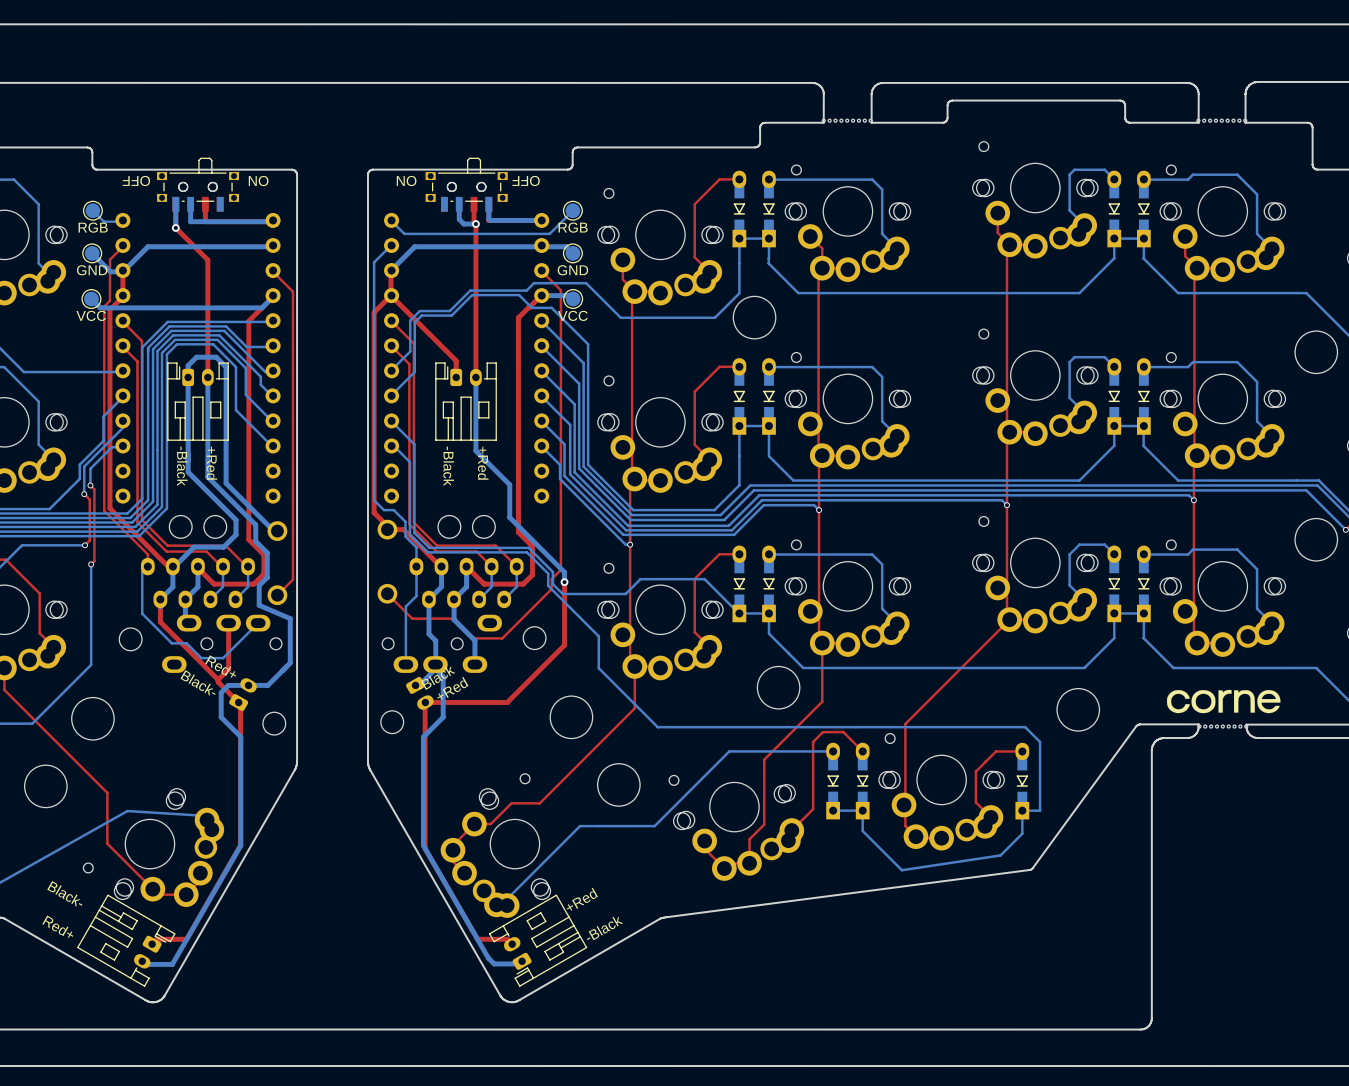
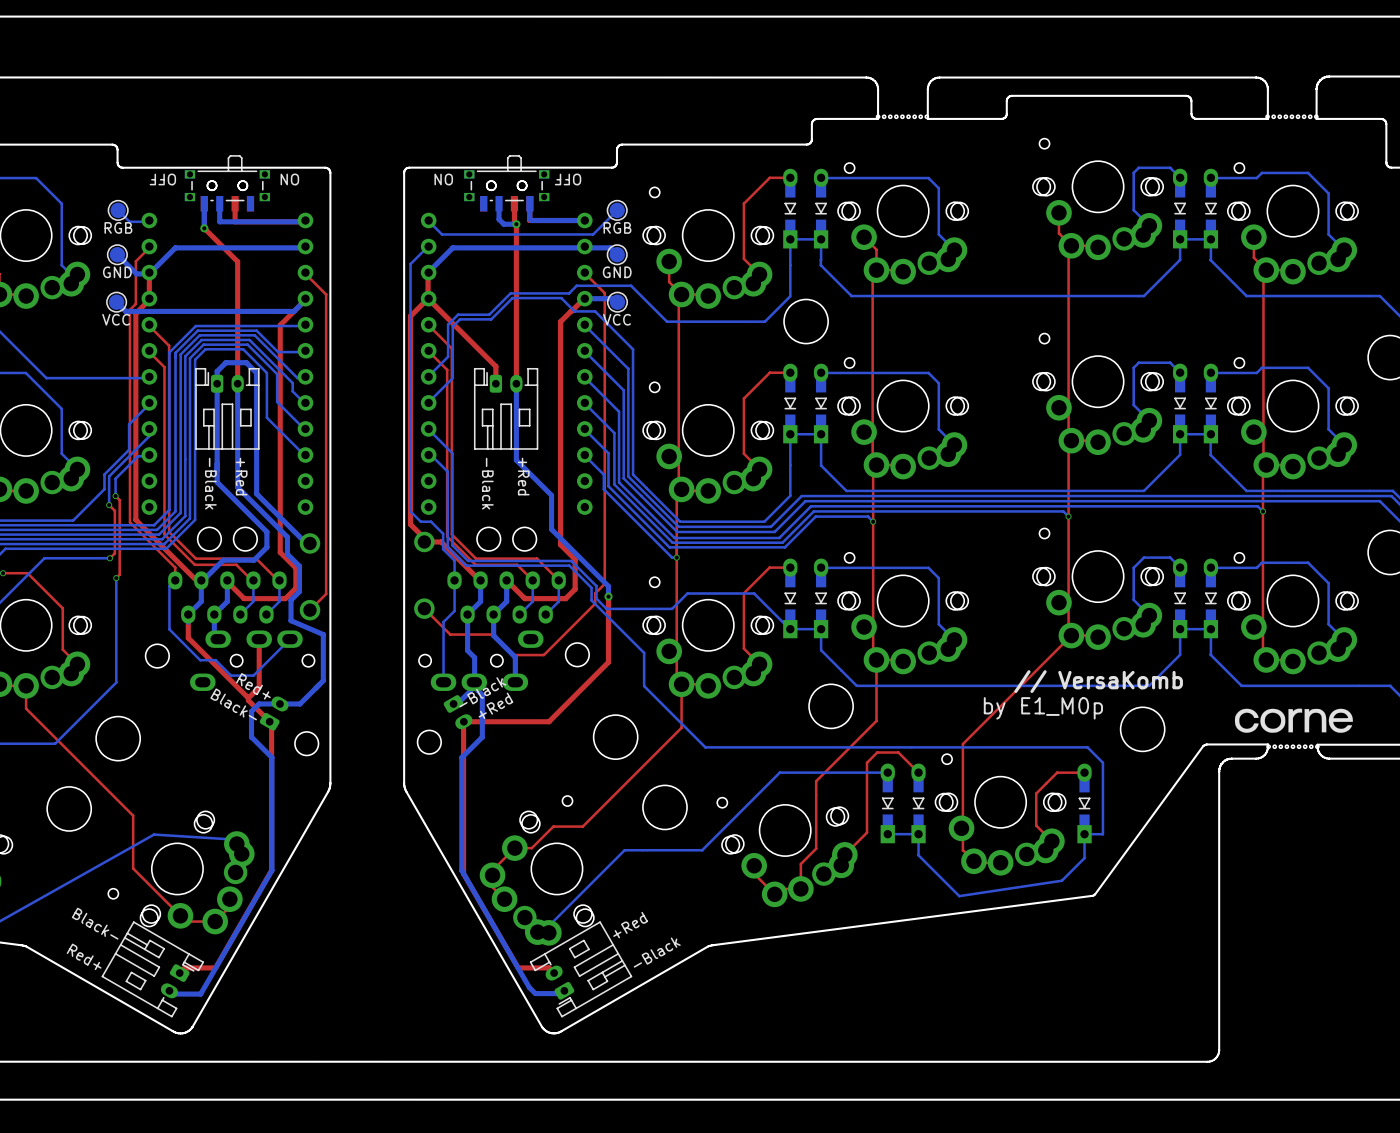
text: none -> // VersaKomb (1098, 681)
text: none -> by E1_M0p (1043, 708)

